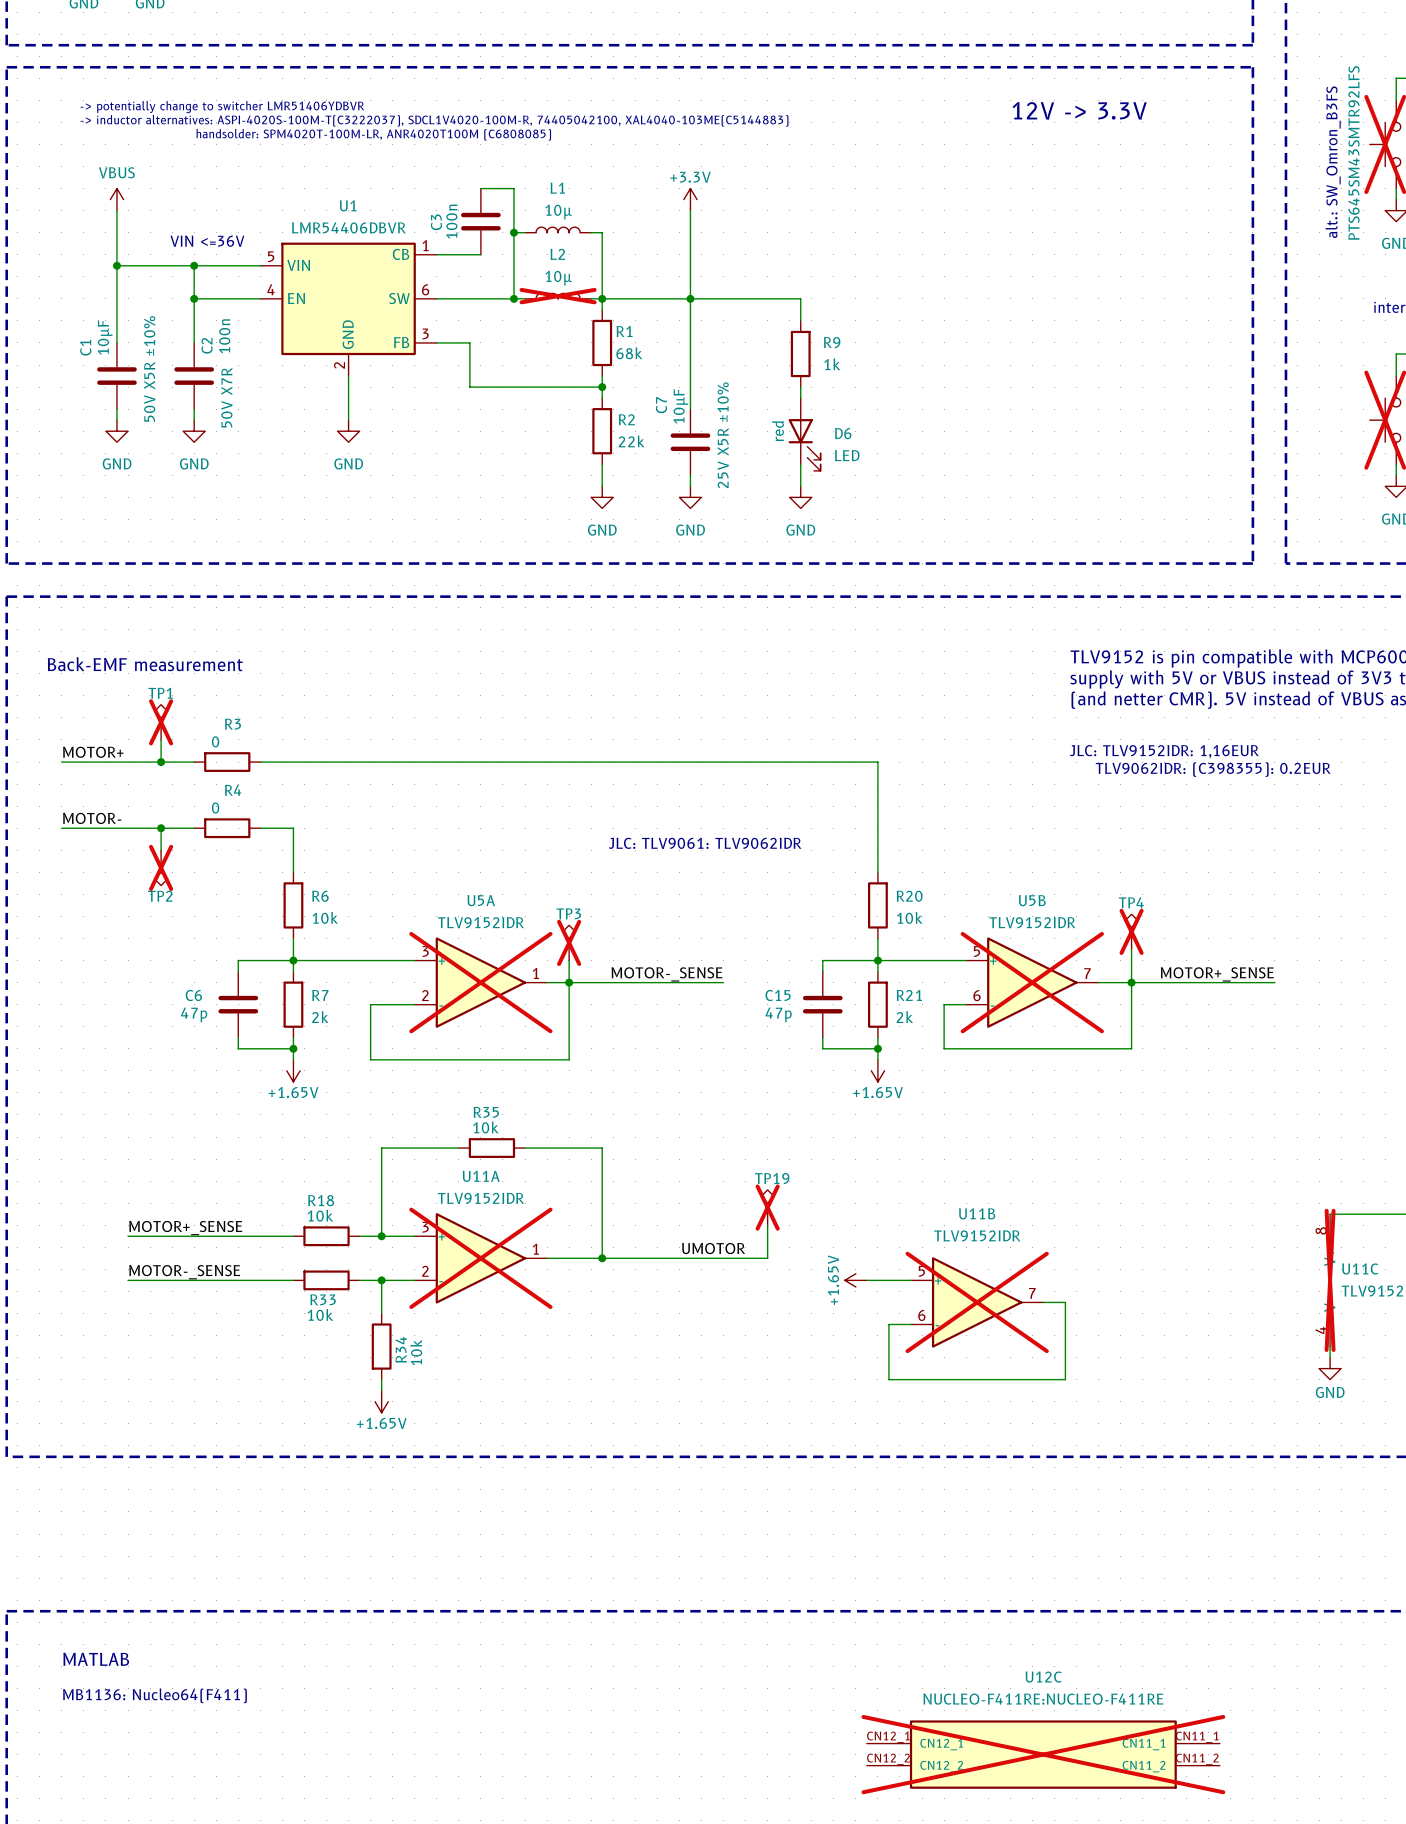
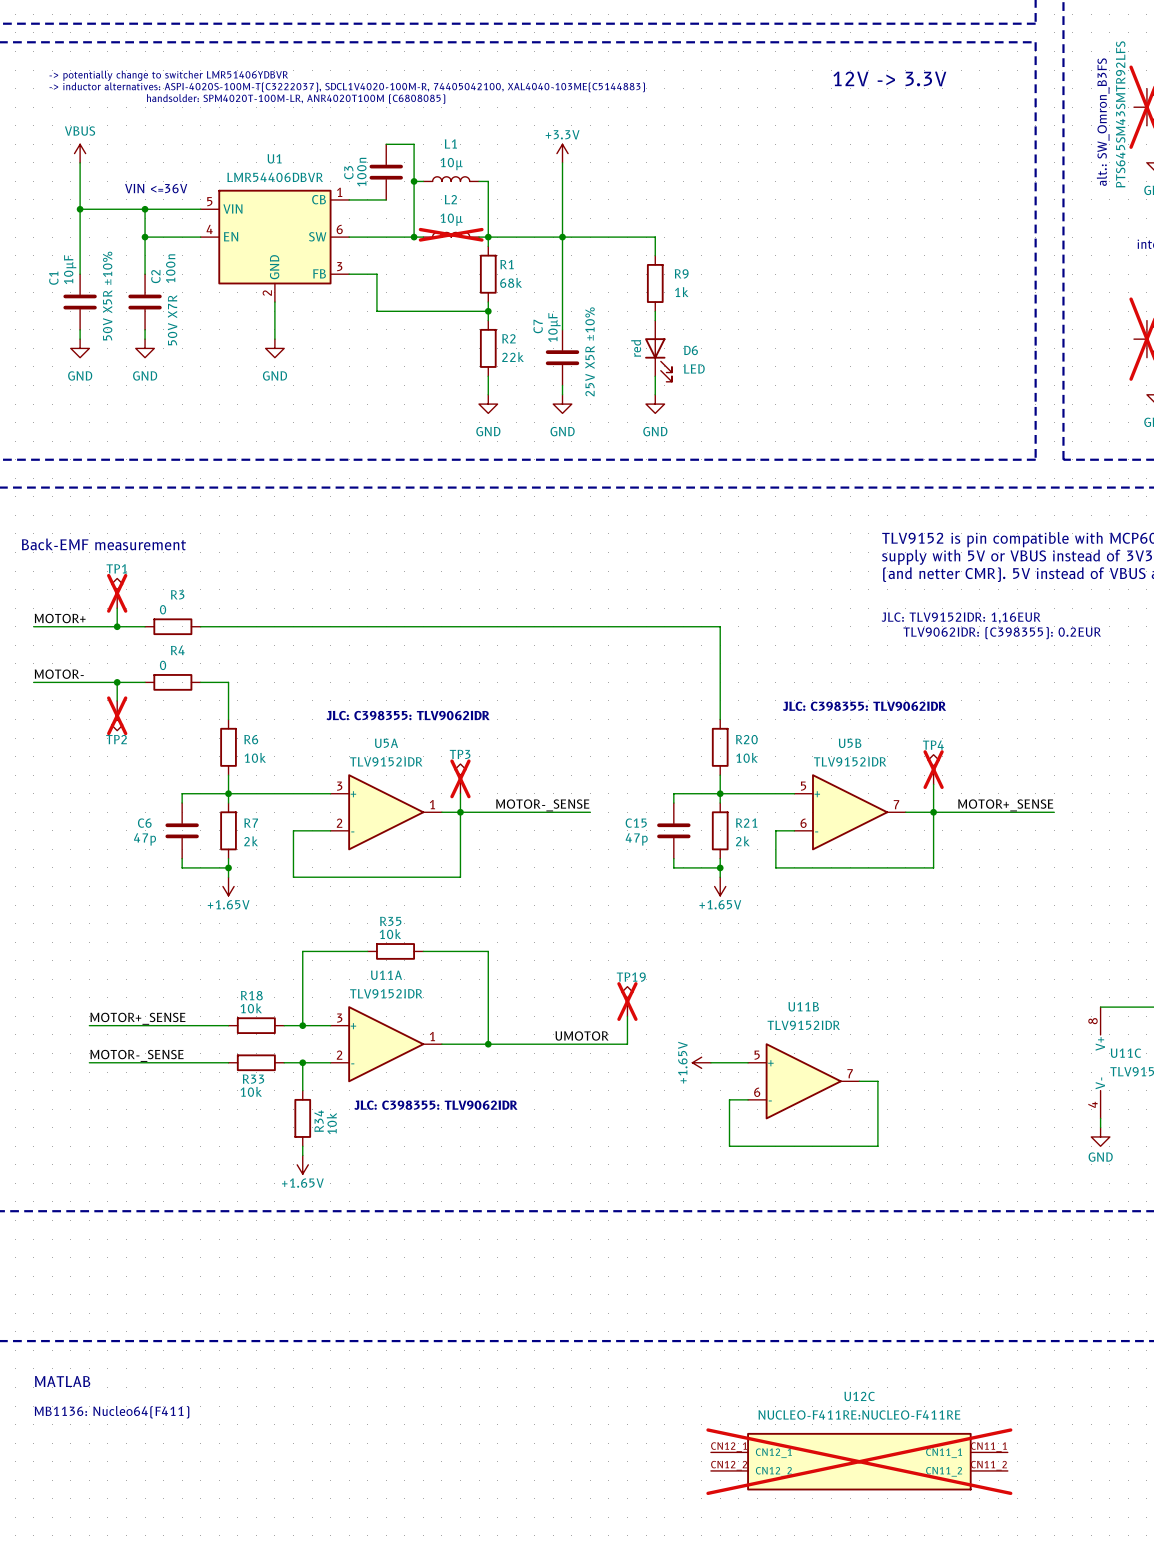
text: JLC: TLV9061: TLV9062IDR (705, 843) -> none
text: none -> JLC: C398355: TLV9062IDR (864, 706)
text: none -> JLC: C398355: TLV9062IDR (408, 715)
U5A do-not-place cross: (480, 982) -> none
U5B do-not-place cross: (1032, 982) -> none
U11A do-not-place cross: (480, 1258) -> none
U11C do-not-place cross: (1330, 1280) -> none
U11B do-not-place cross: (977, 1302) -> none
text: none -> JLC: C398355: TLV9062IDR (435, 1105)

